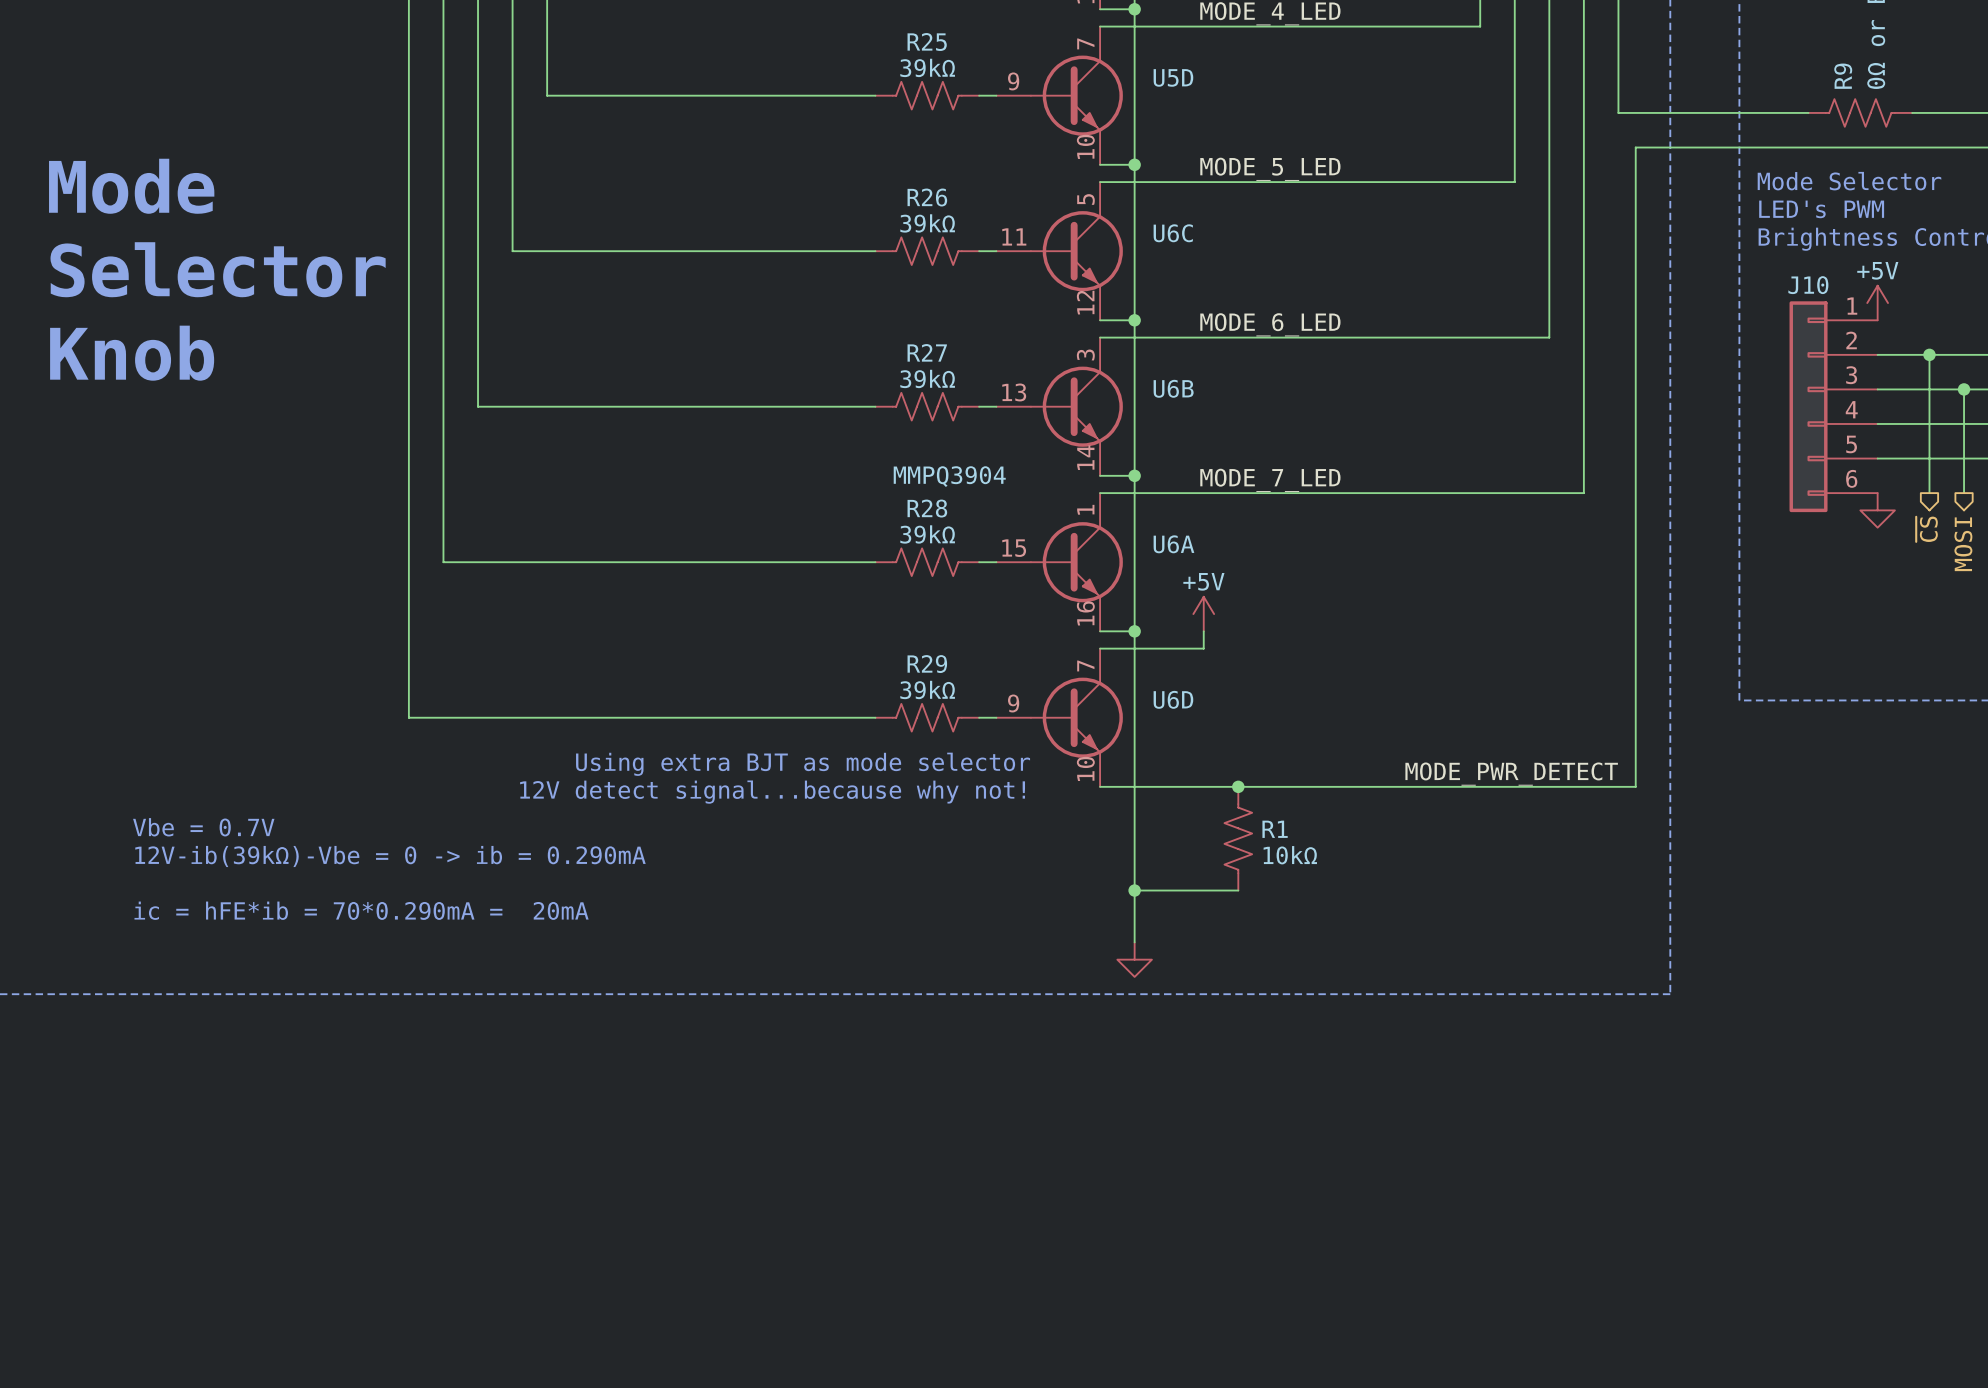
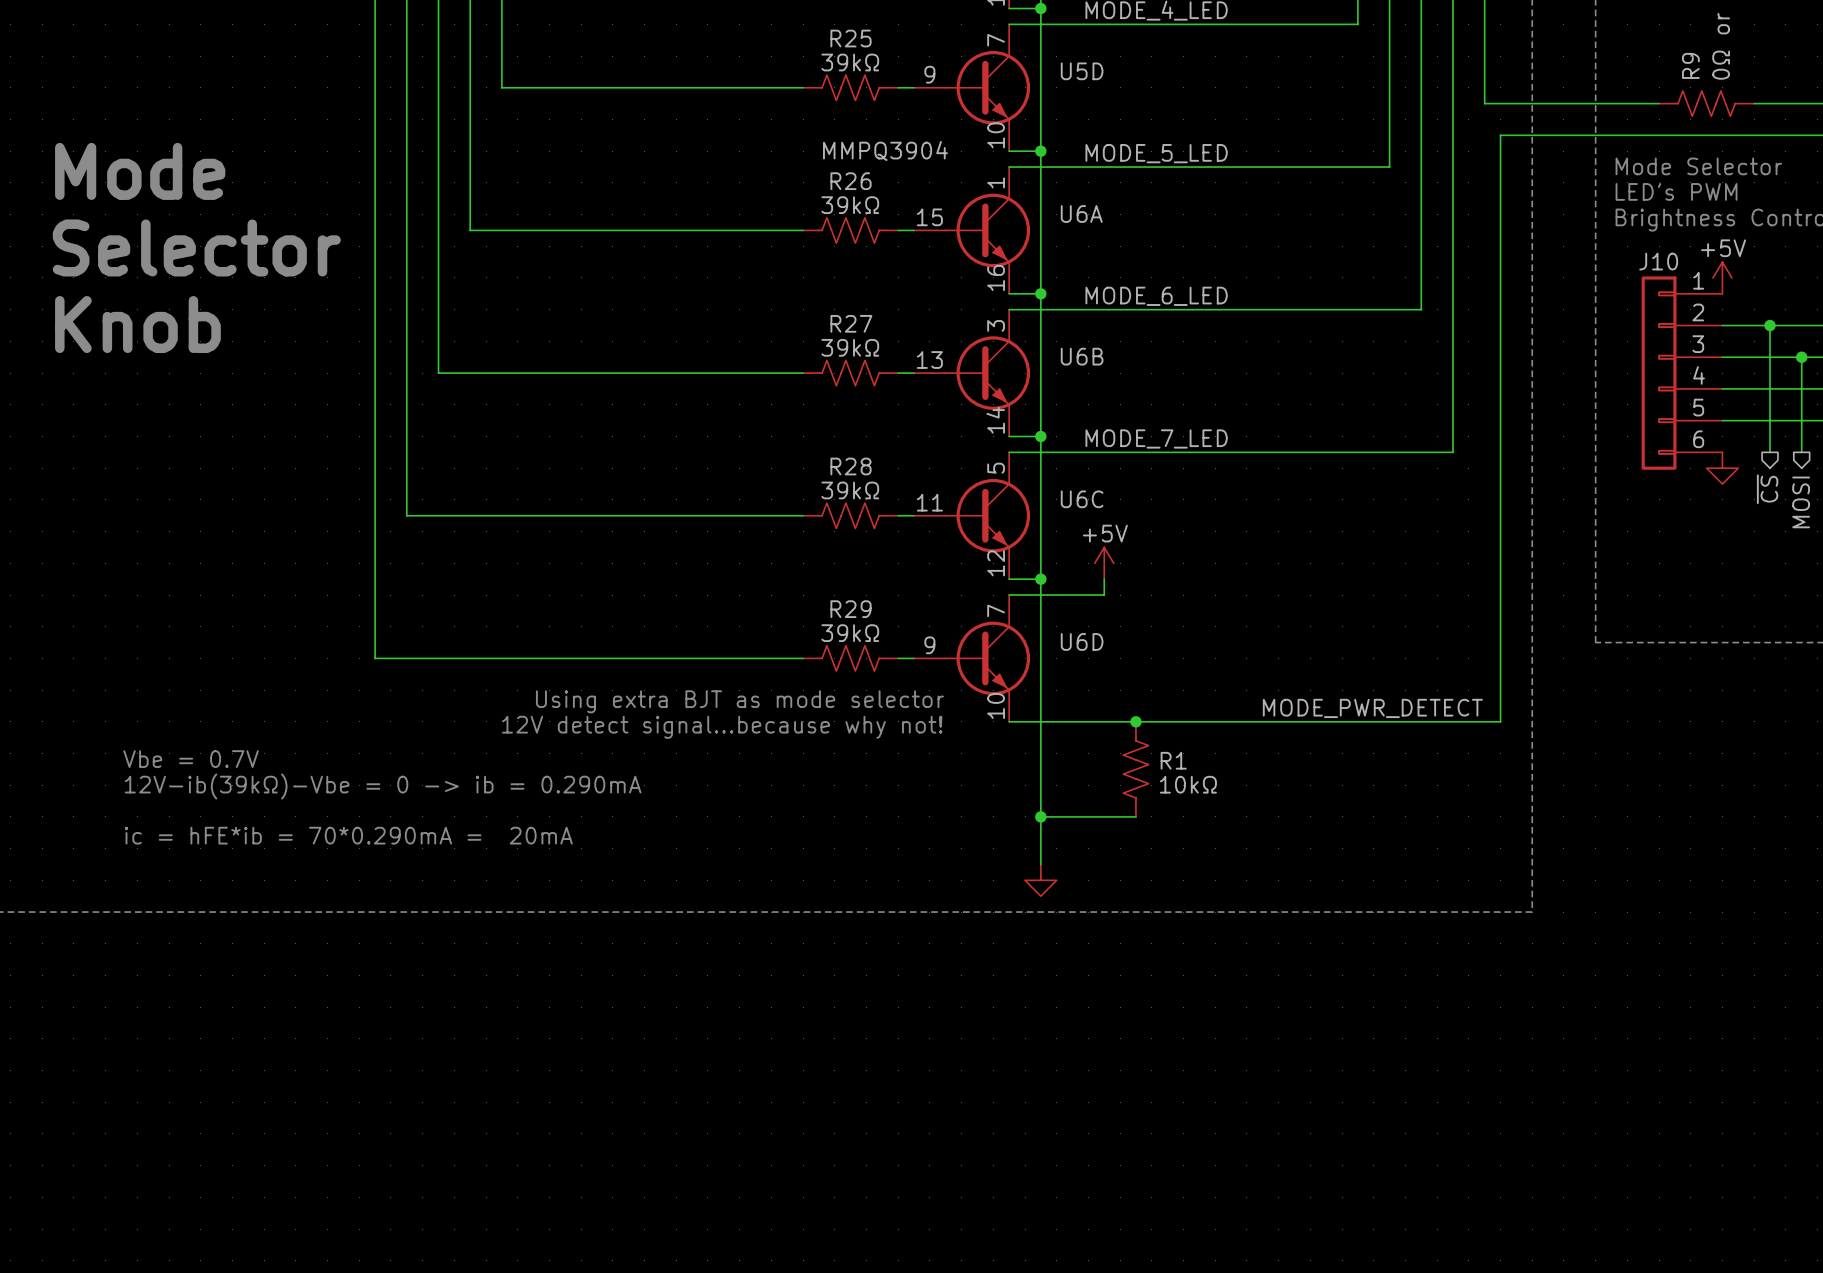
U6C position: (1059, 251) -> (972, 515)
U6A position: (1059, 562) -> (972, 230)

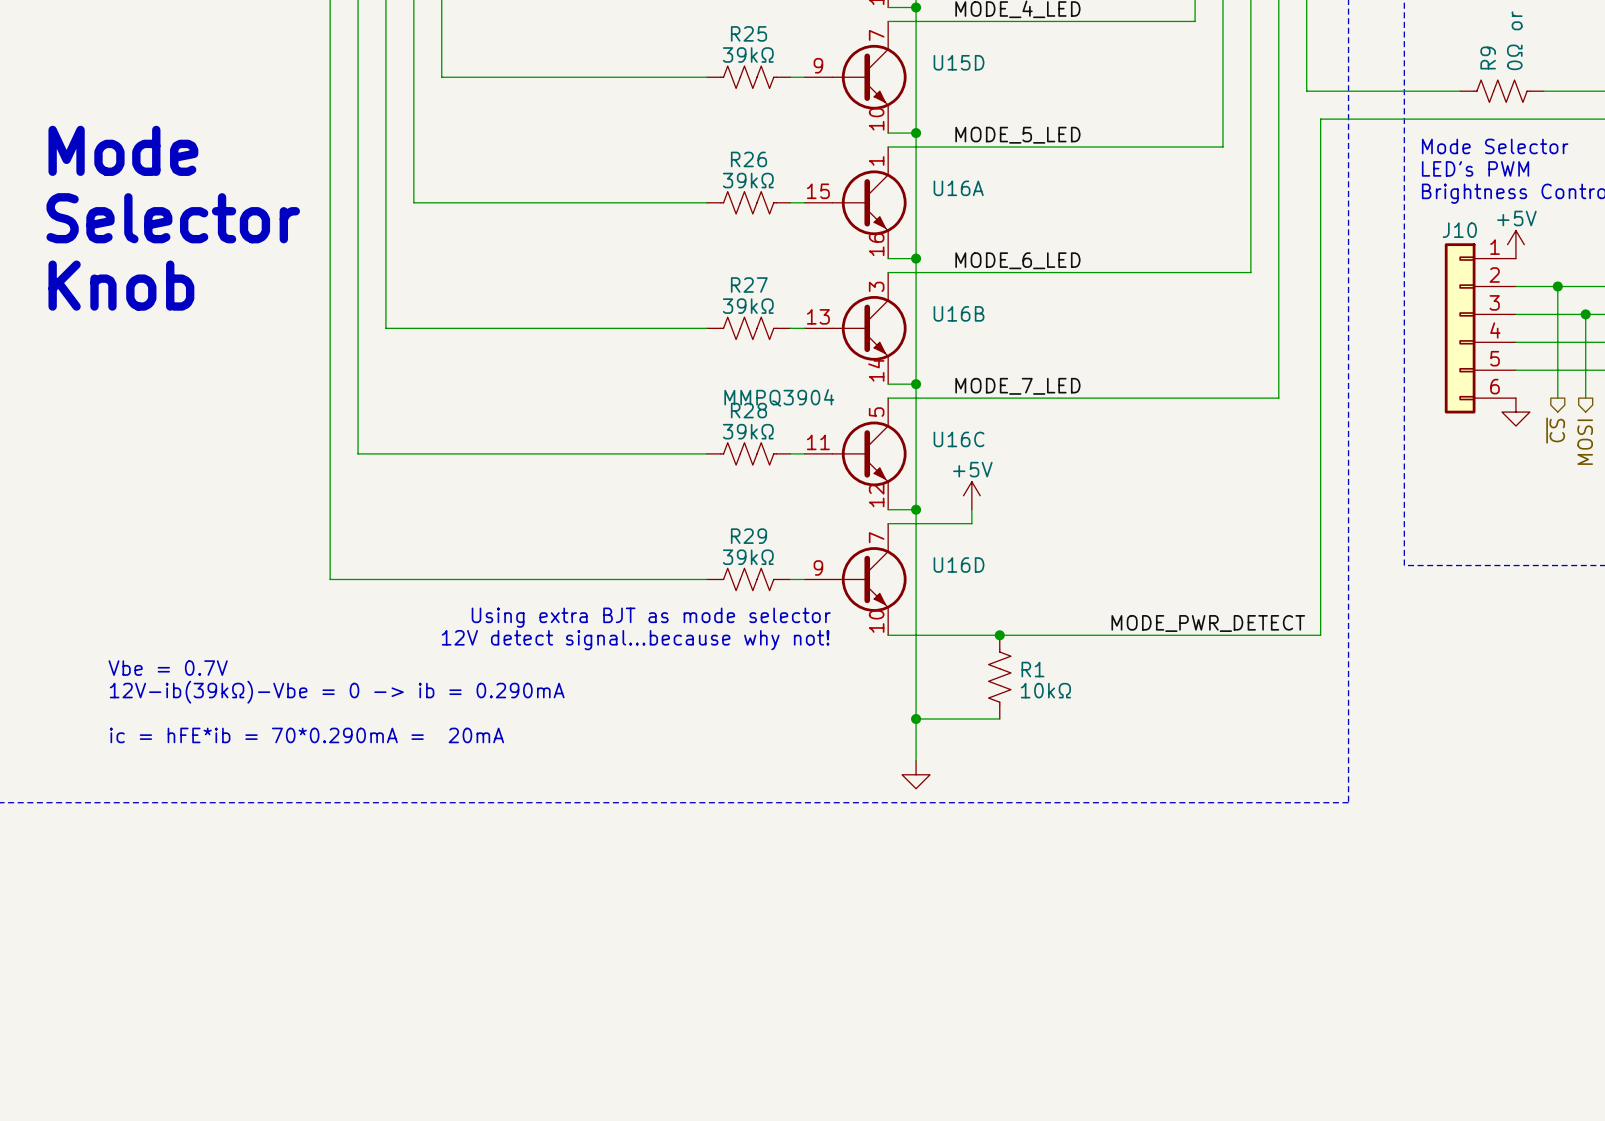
U5D name: U5D (1082, 71) -> U15D (959, 62)
U6A value position: MMPQ3904 (885, 150) -> MMPQ3904 (779, 397)
U6A name: U6A (1081, 213) -> U16A (958, 188)
U6B name: U6B (1082, 356) -> U16B (959, 313)
U6C name: U6C (1082, 499) -> U16C (959, 439)
U6D name: U6D (1082, 641) -> U16D (959, 565)

